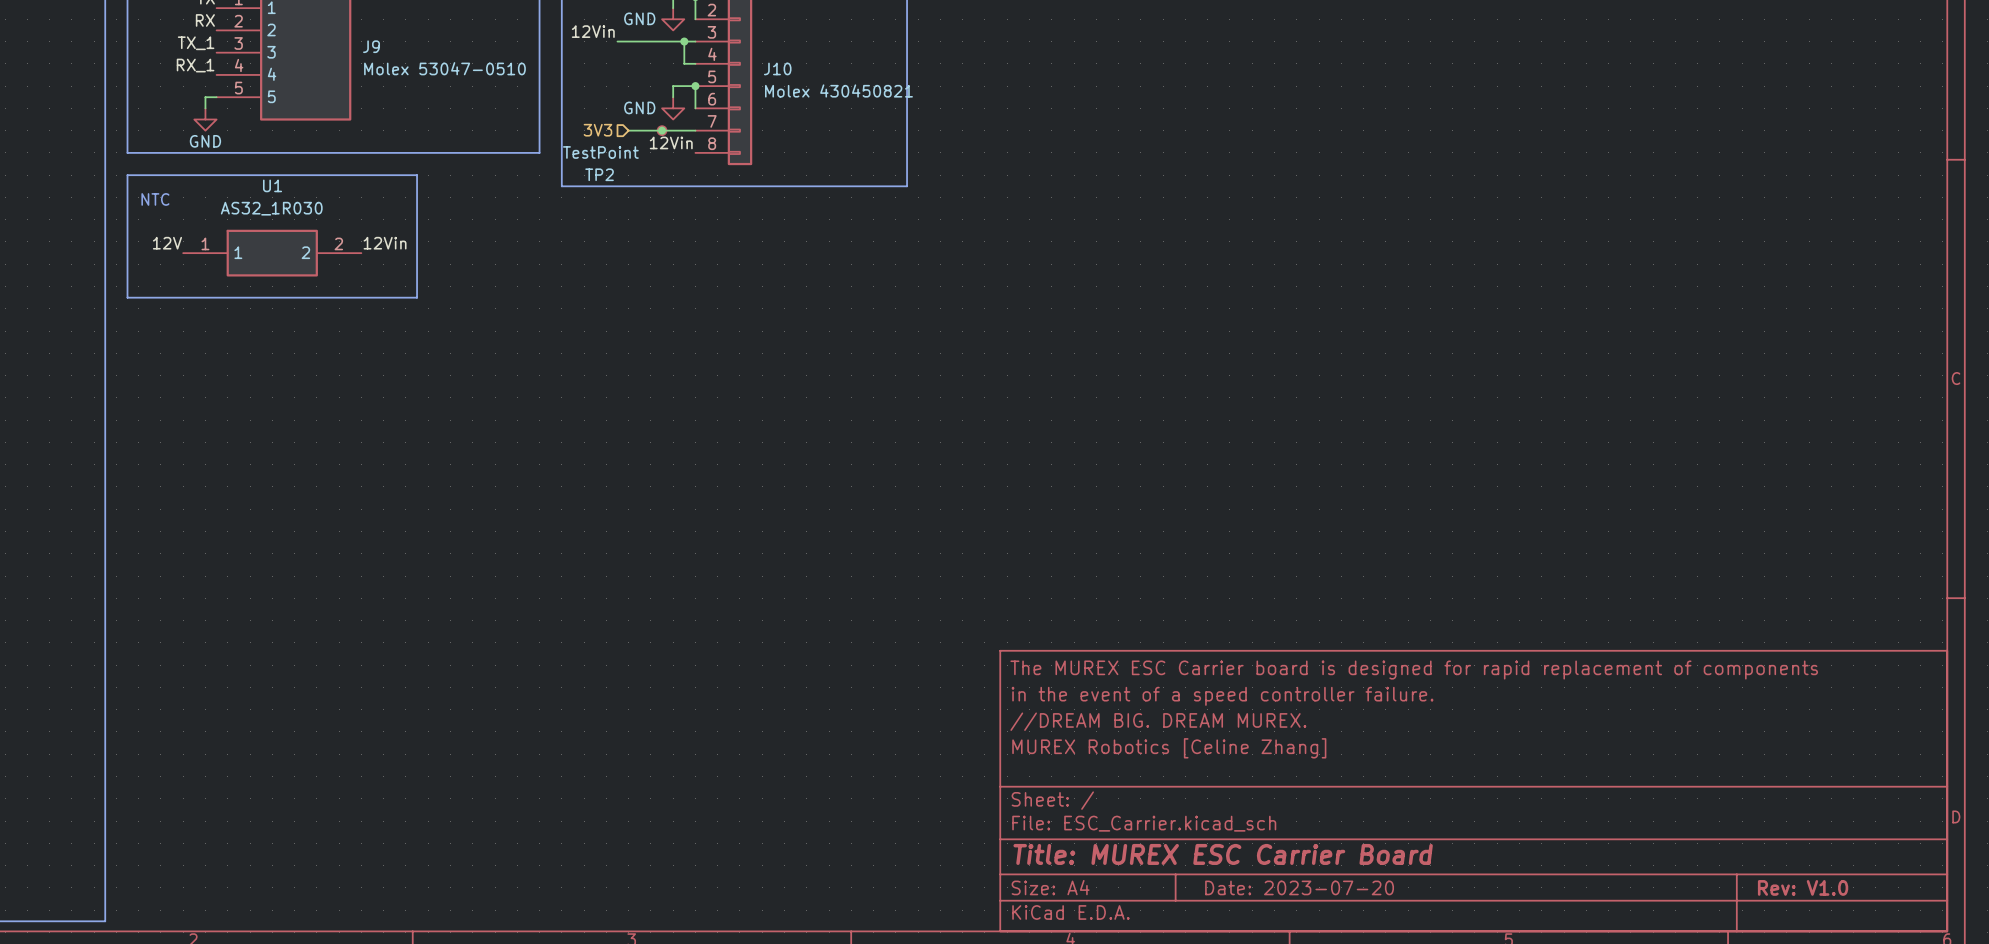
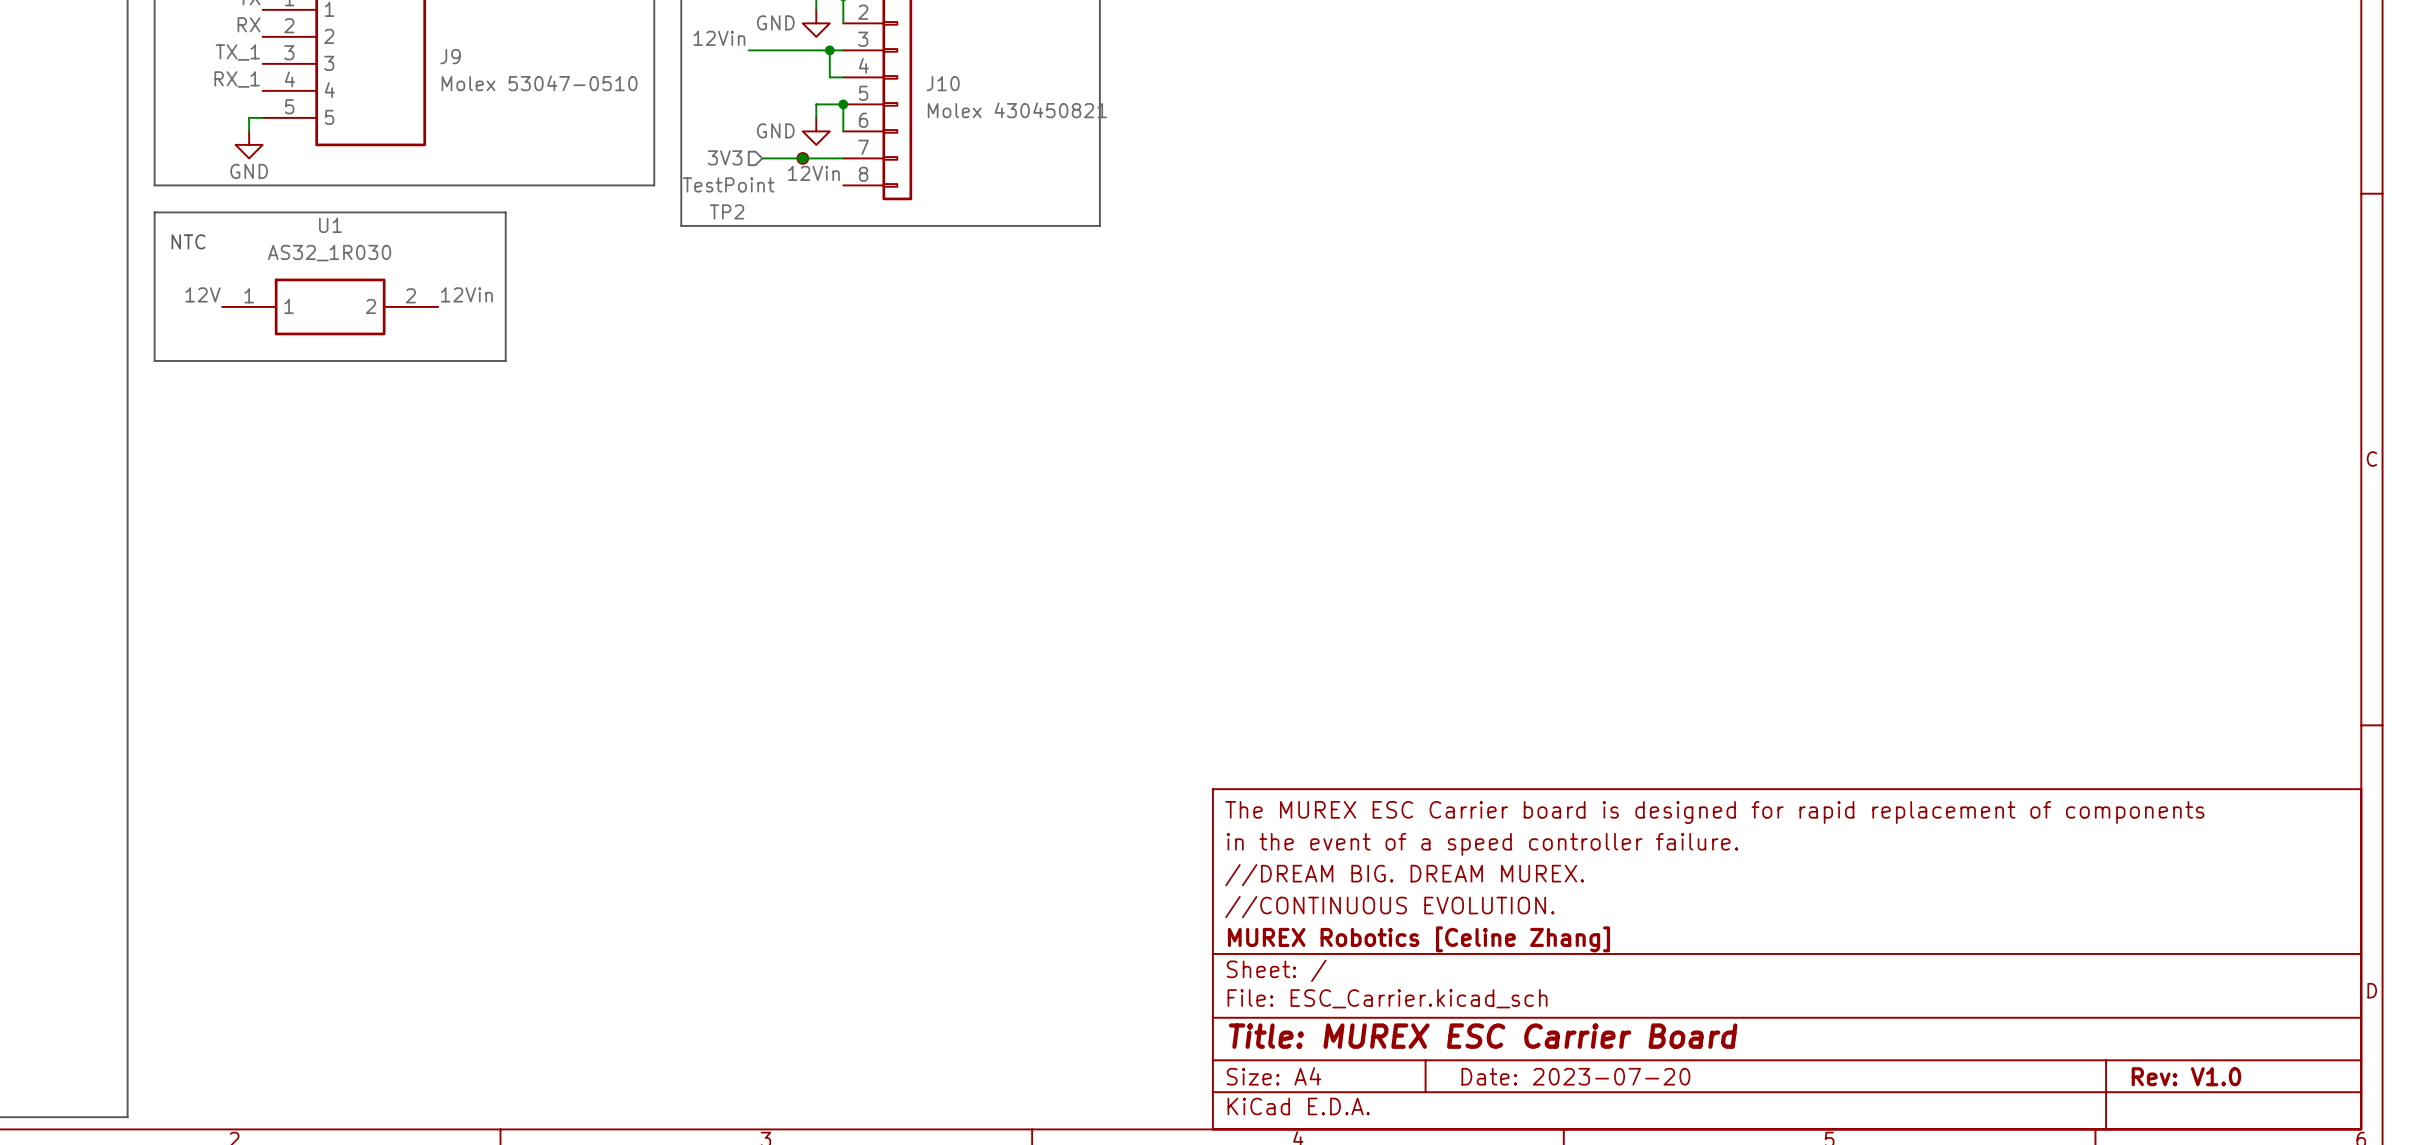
title block: MUREX Robotics [Celine Zhang] (1169, 748) -> //CONTINUOUS EVOLUTION. (1389, 907)
title block: none -> MUREX Robotics [Celine Zhang] (1418, 939)

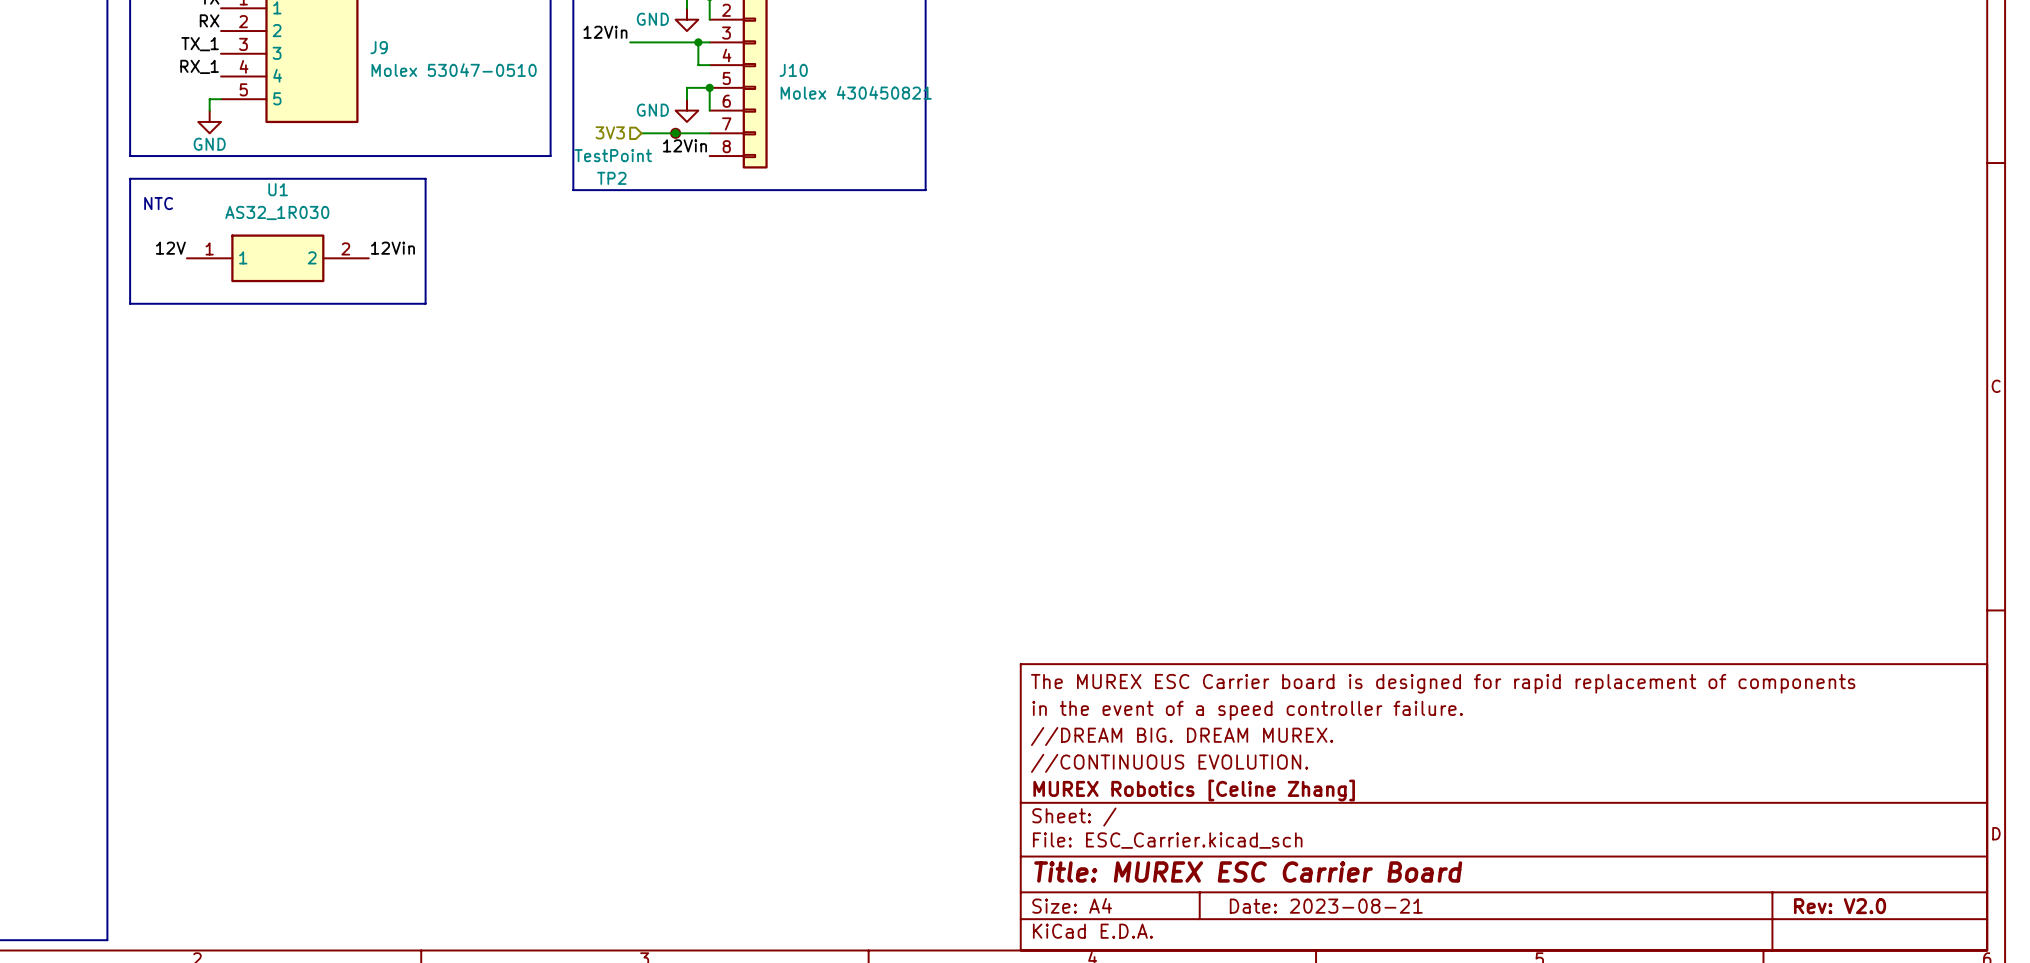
title block: Date: 2023-07-20 (1575, 1076) -> Date: 2023-08-21 (1326, 906)
title block: Rev: V1.0 (2186, 1076) -> Rev: V2.0 (1840, 906)

